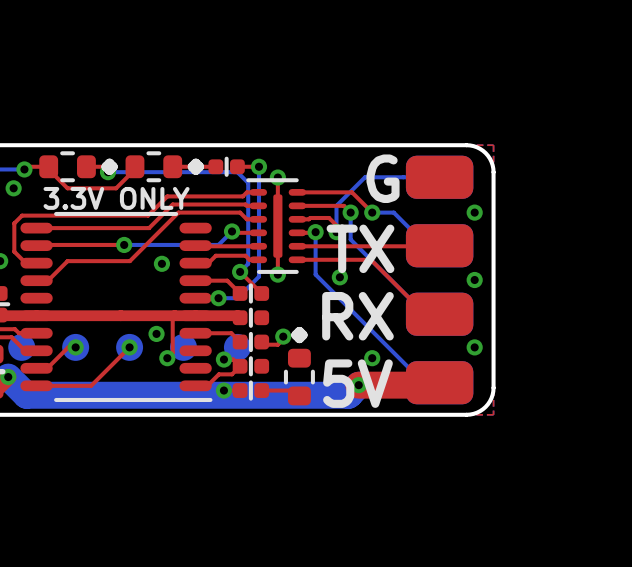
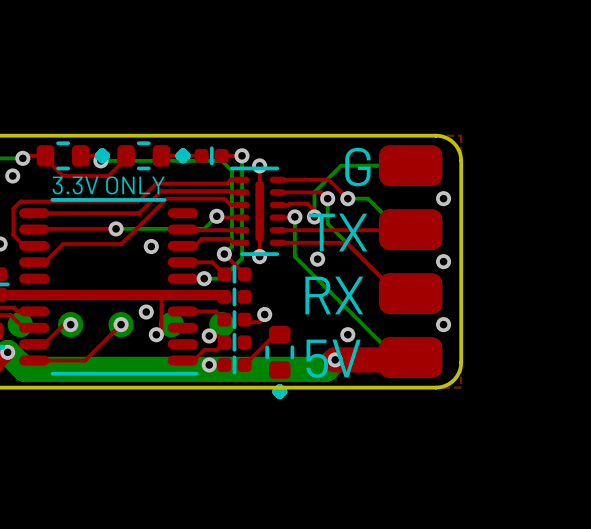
part rotation: 0° (299, 366) -> 180° (279, 362)
top track: (261, 390) (294, 390) (299, 395) -> (244, 364) (274, 334) (279, 334)

